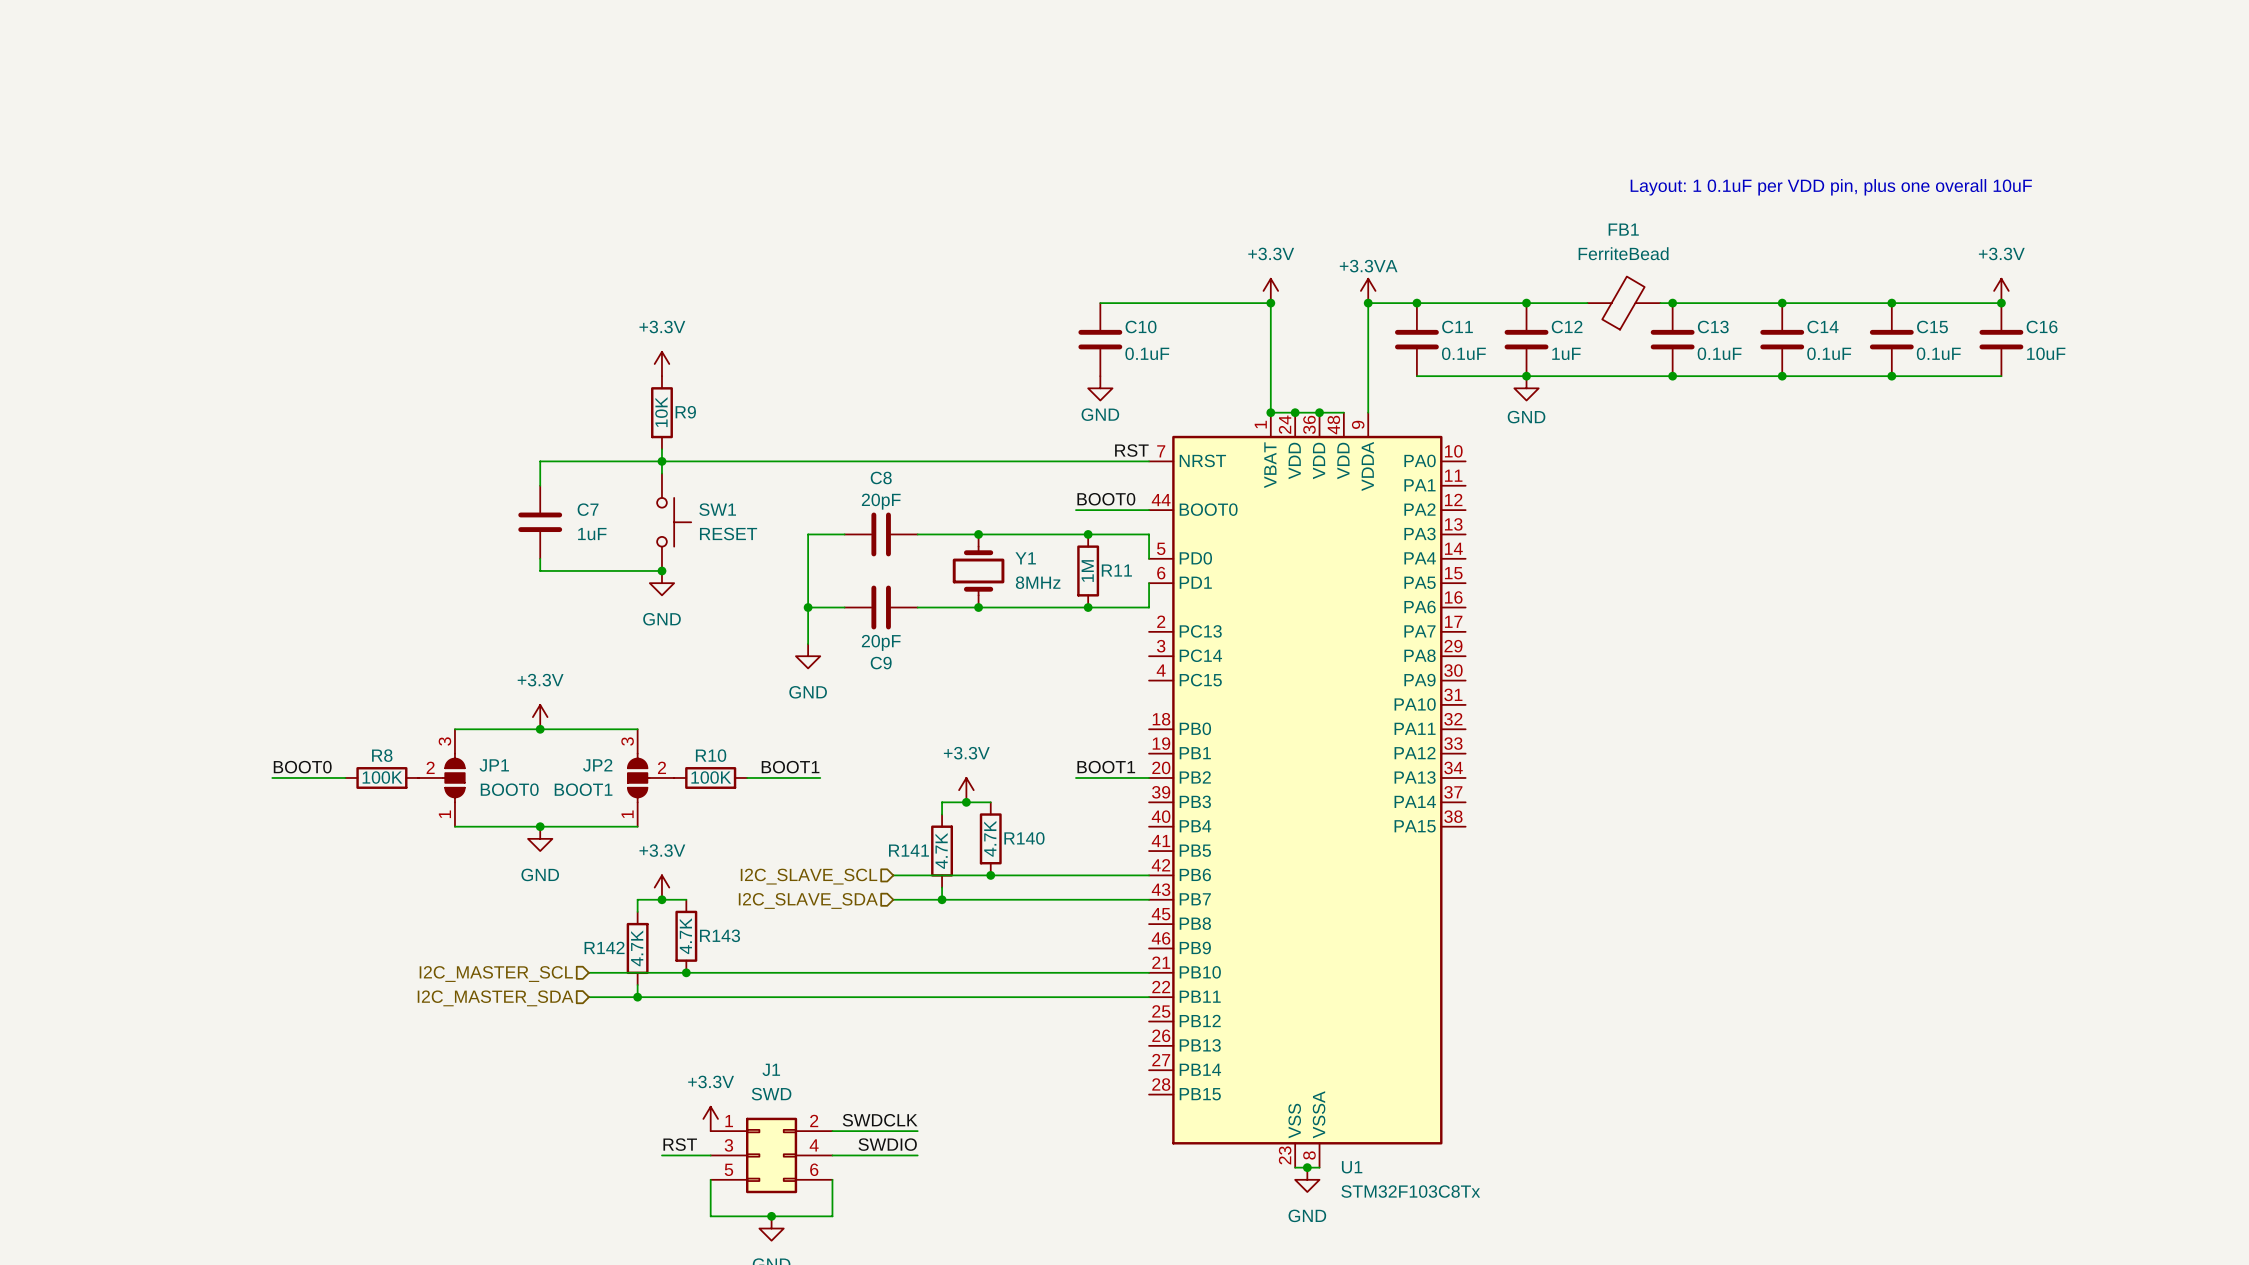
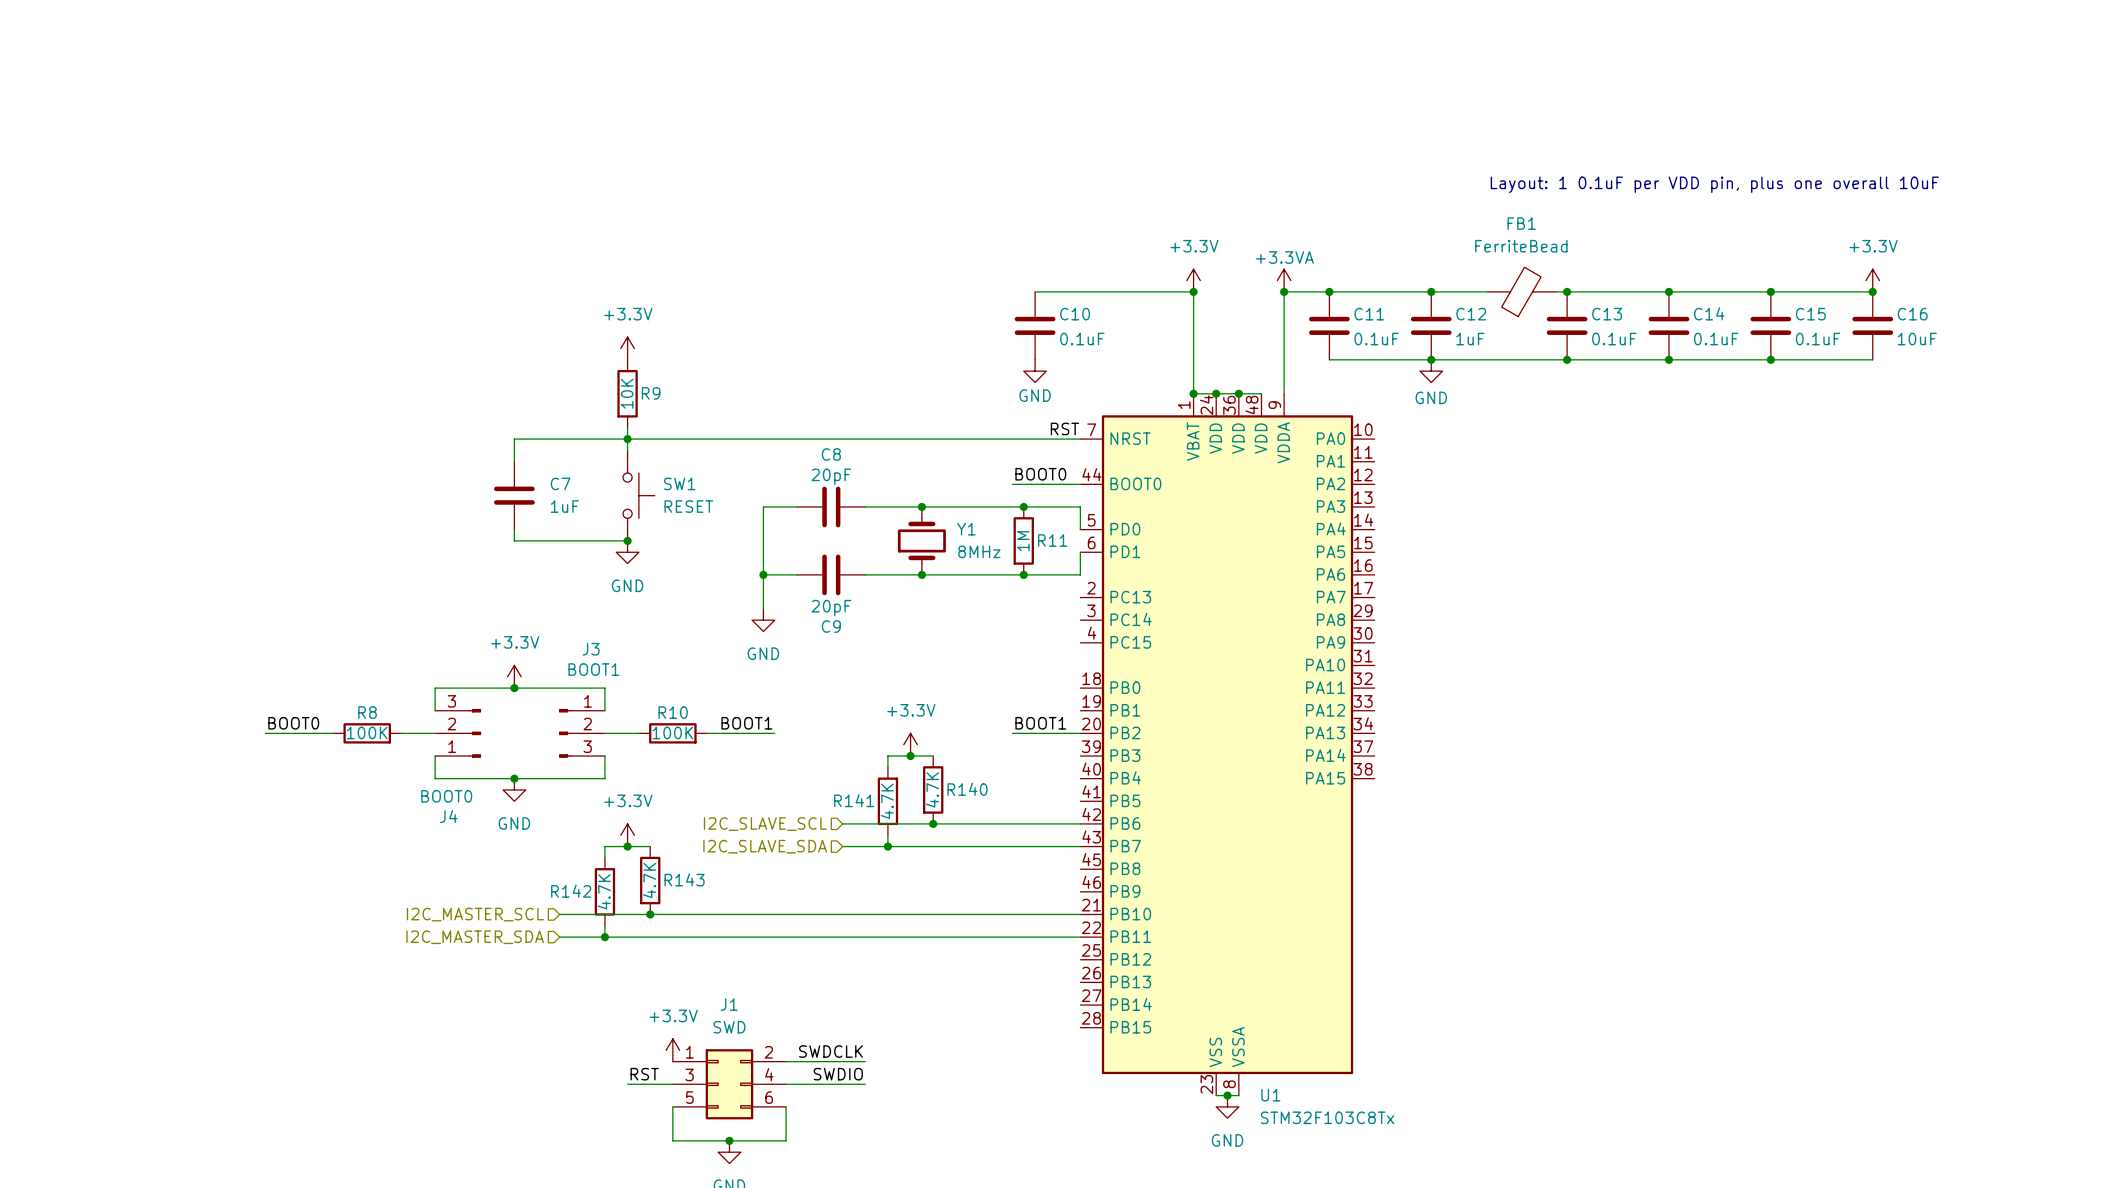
JP1: BOOT0 (441, 777) -> none
J4: none -> BOOT0 (458, 733)
J3: none -> BOOT1 (581, 733)
JP2: BOOT1 (651, 777) -> none

